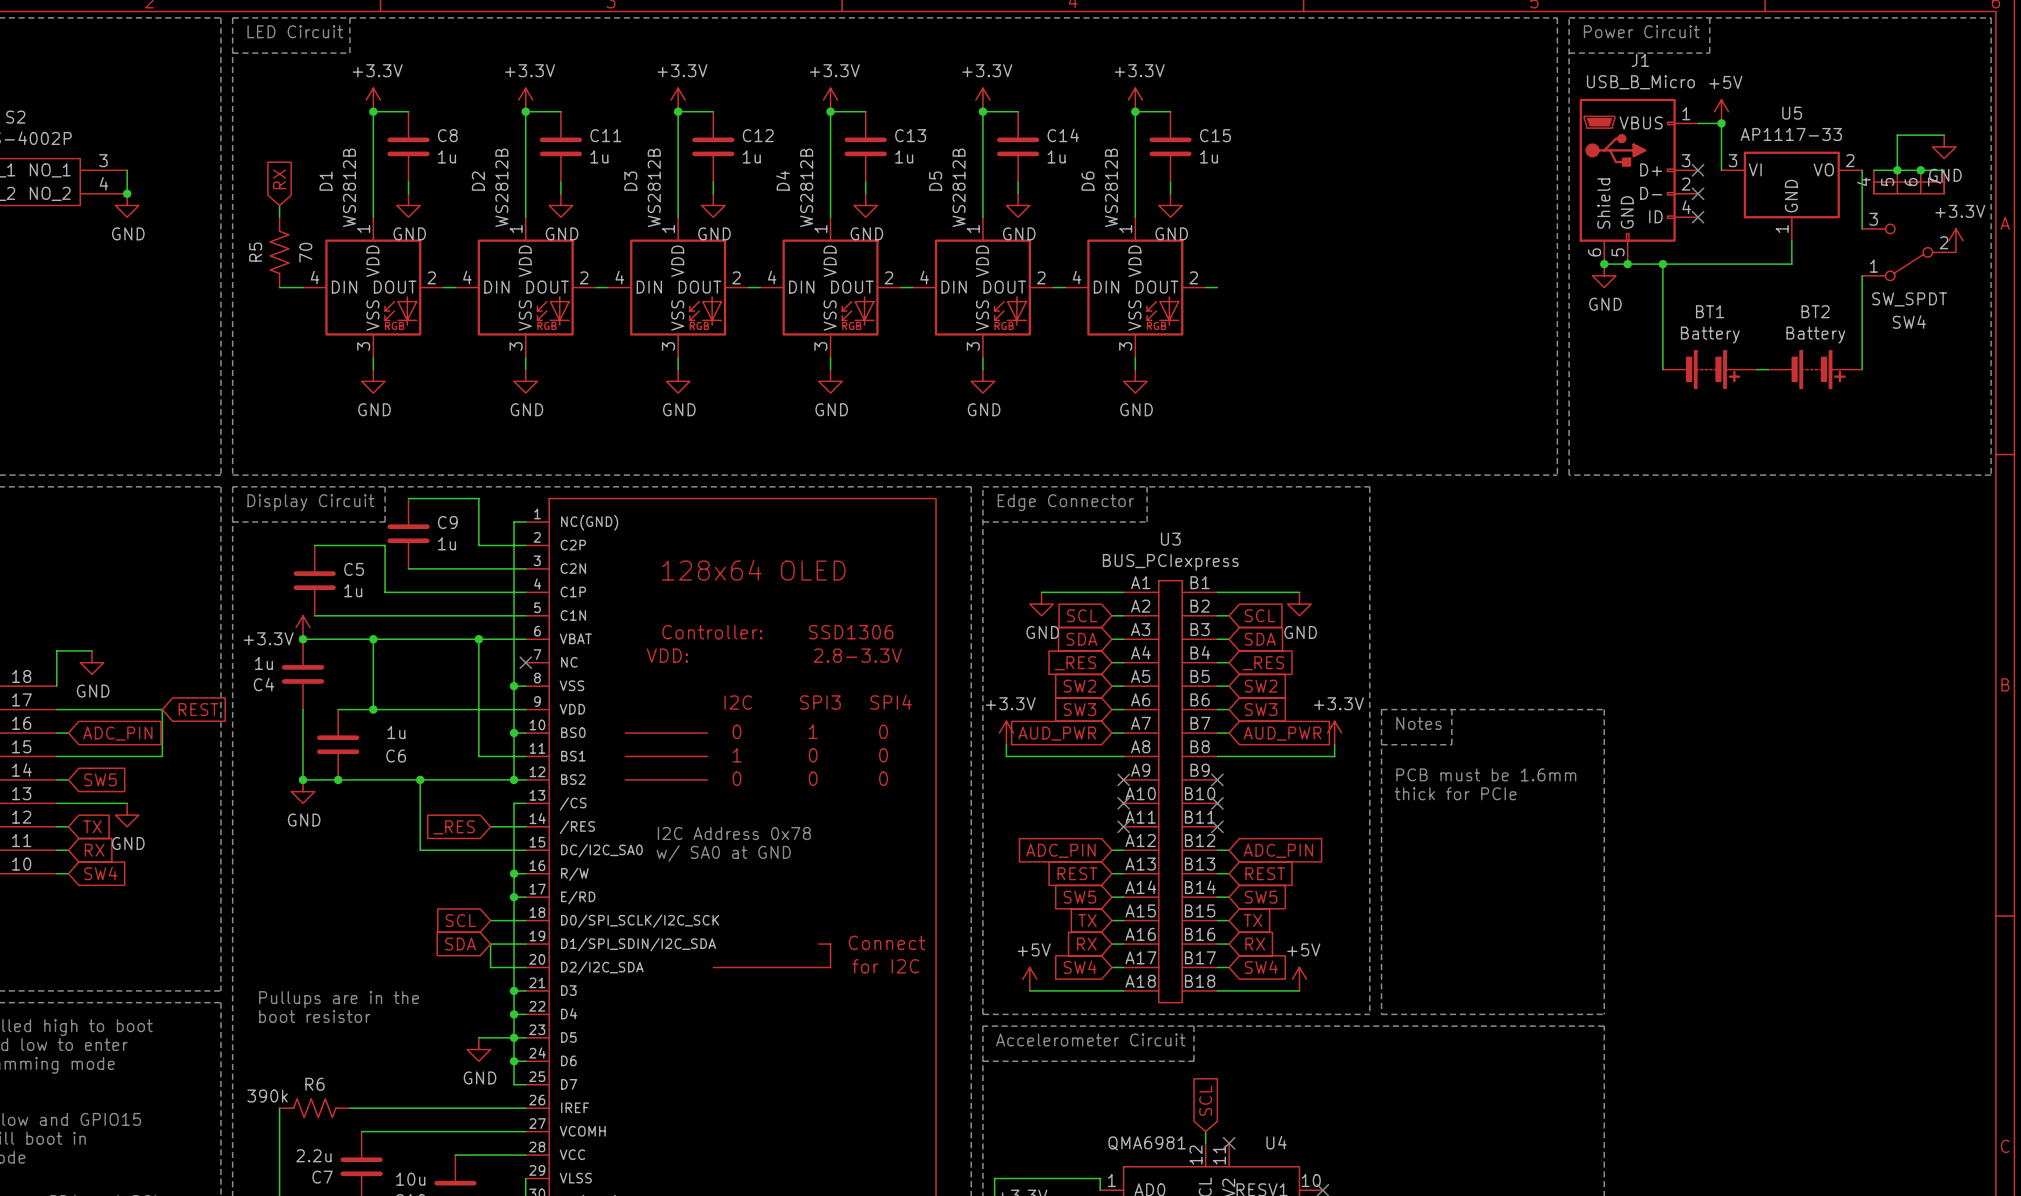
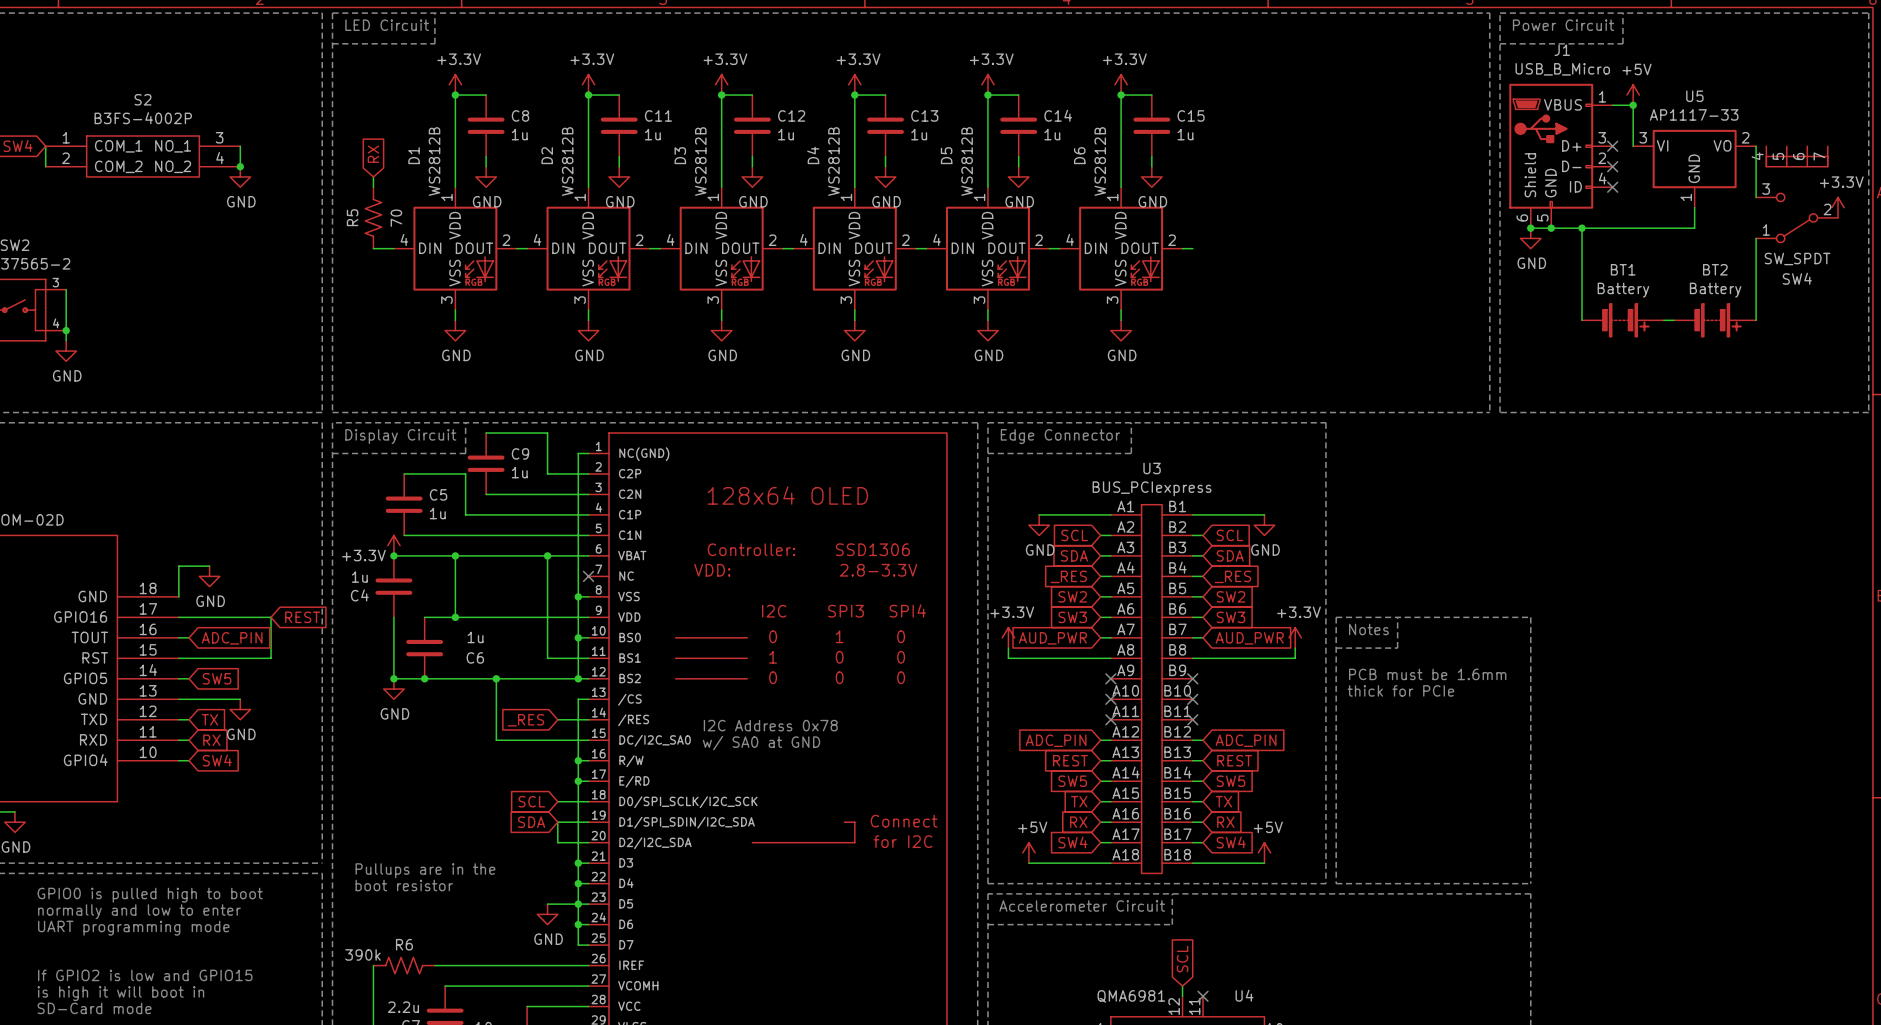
wire: (1944, 135) (1897, 135) (1897, 170) -> none
power symbol: GND (1944, 146) -> none
wire: (1873, 170) (1944, 170) -> none
junction: (1897, 170) -> none
junction: (1920, 170) -> none

